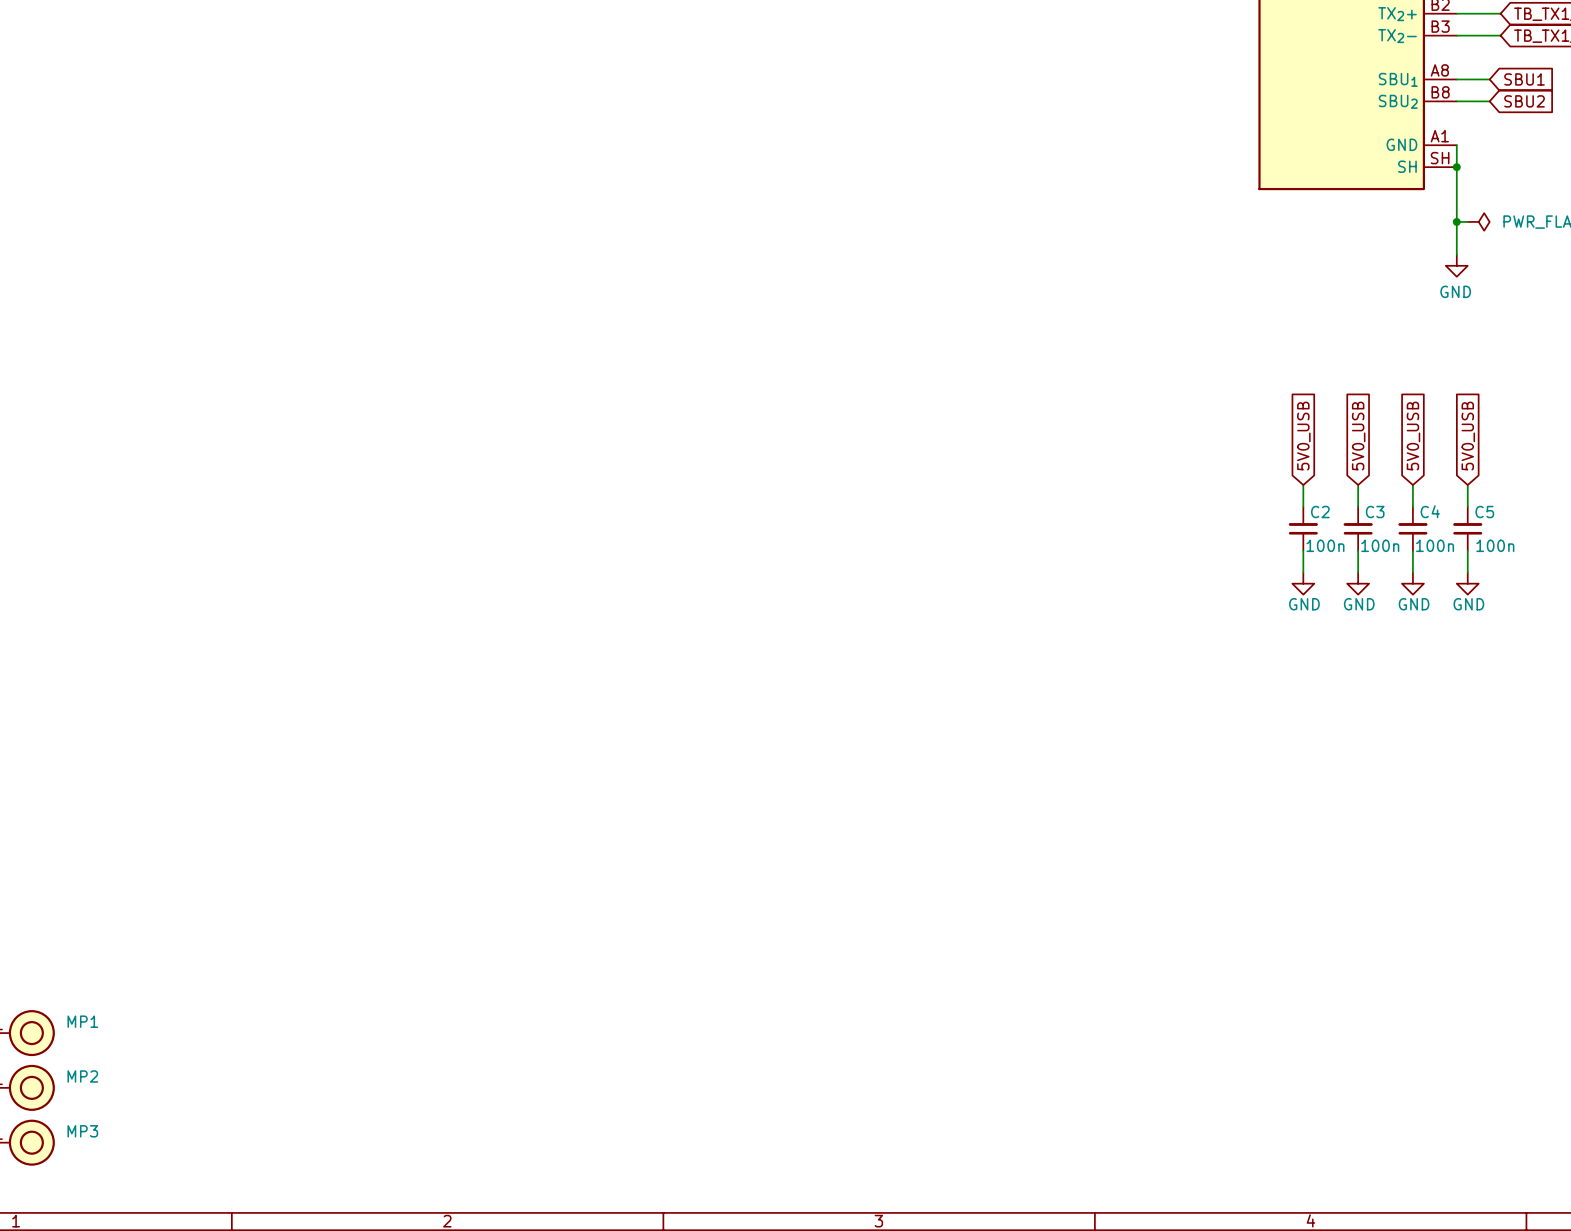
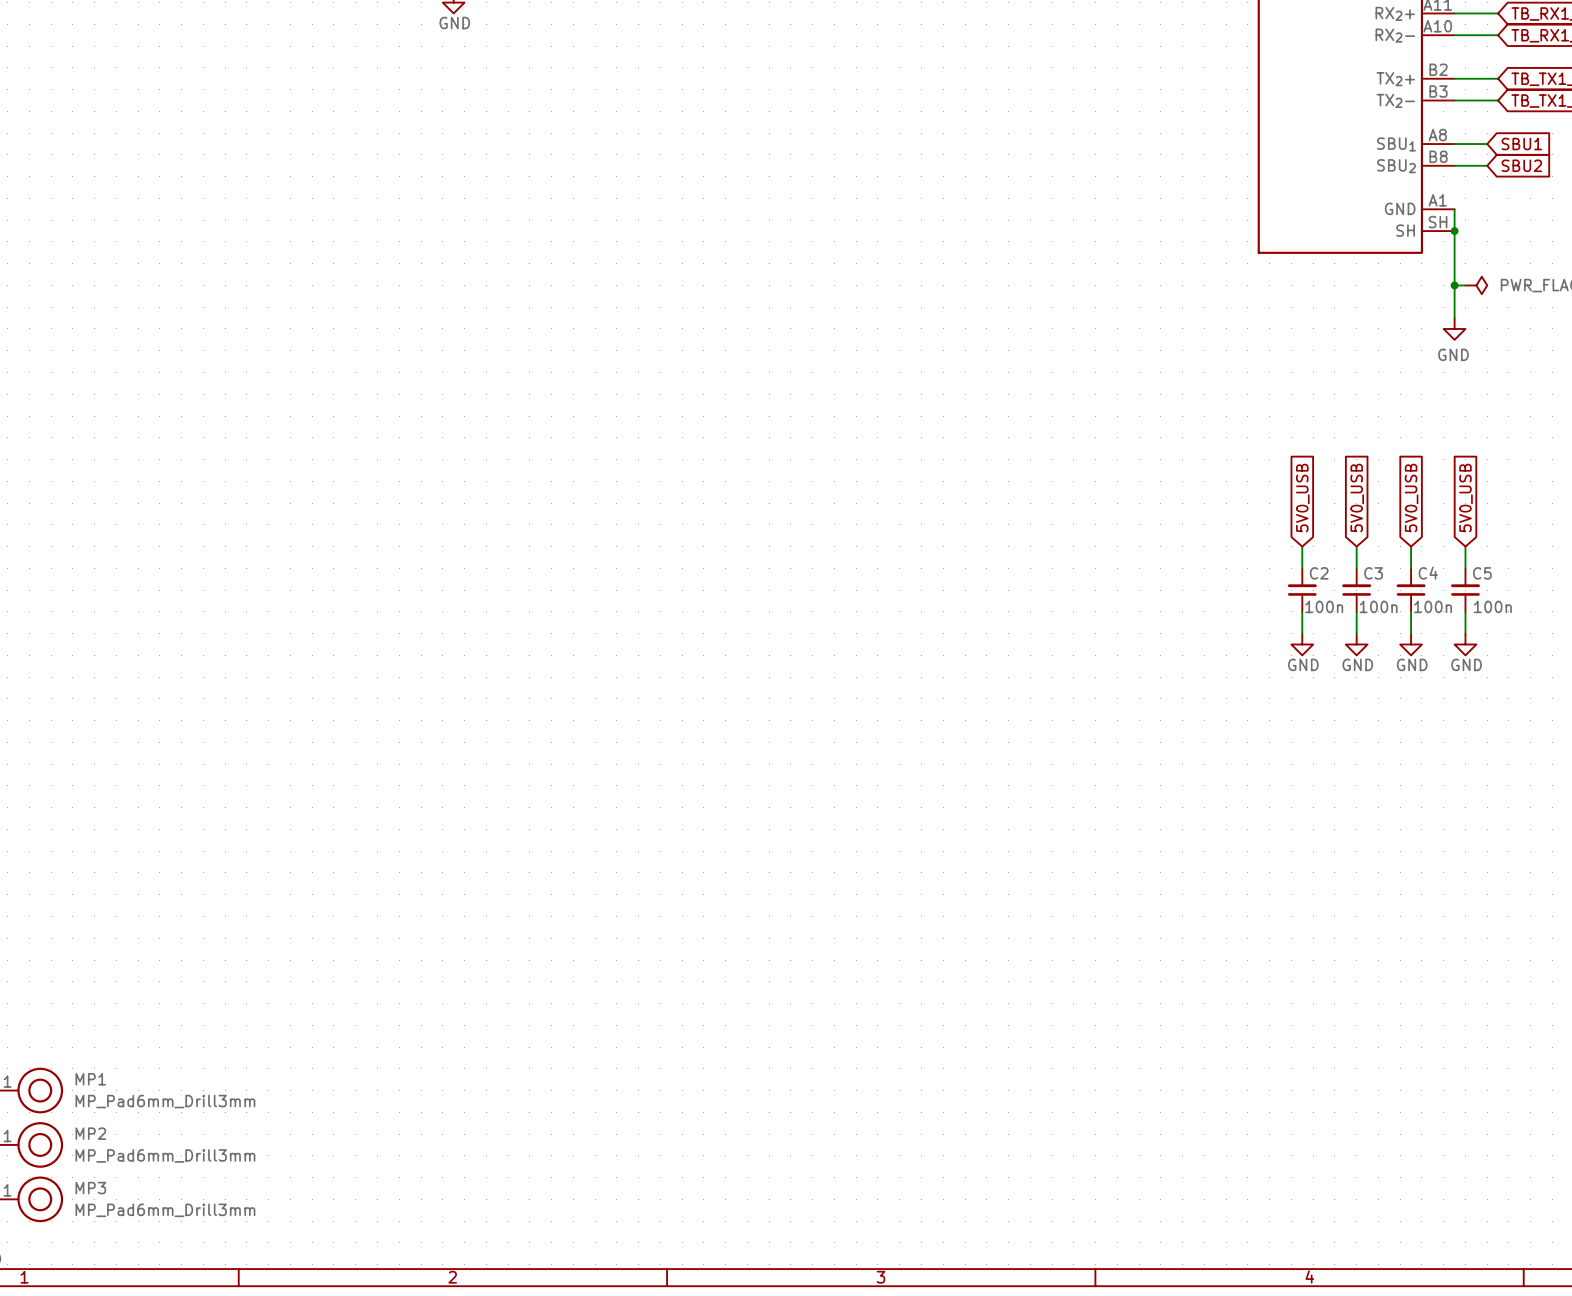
MP1 value: none -> MP_Pad6mm_Drill3mm (165, 1101)
MP2 value: none -> MP_Pad6mm_Drill3mm (165, 1155)
MP3 value: none -> MP_Pad6mm_Drill3mm (165, 1210)

